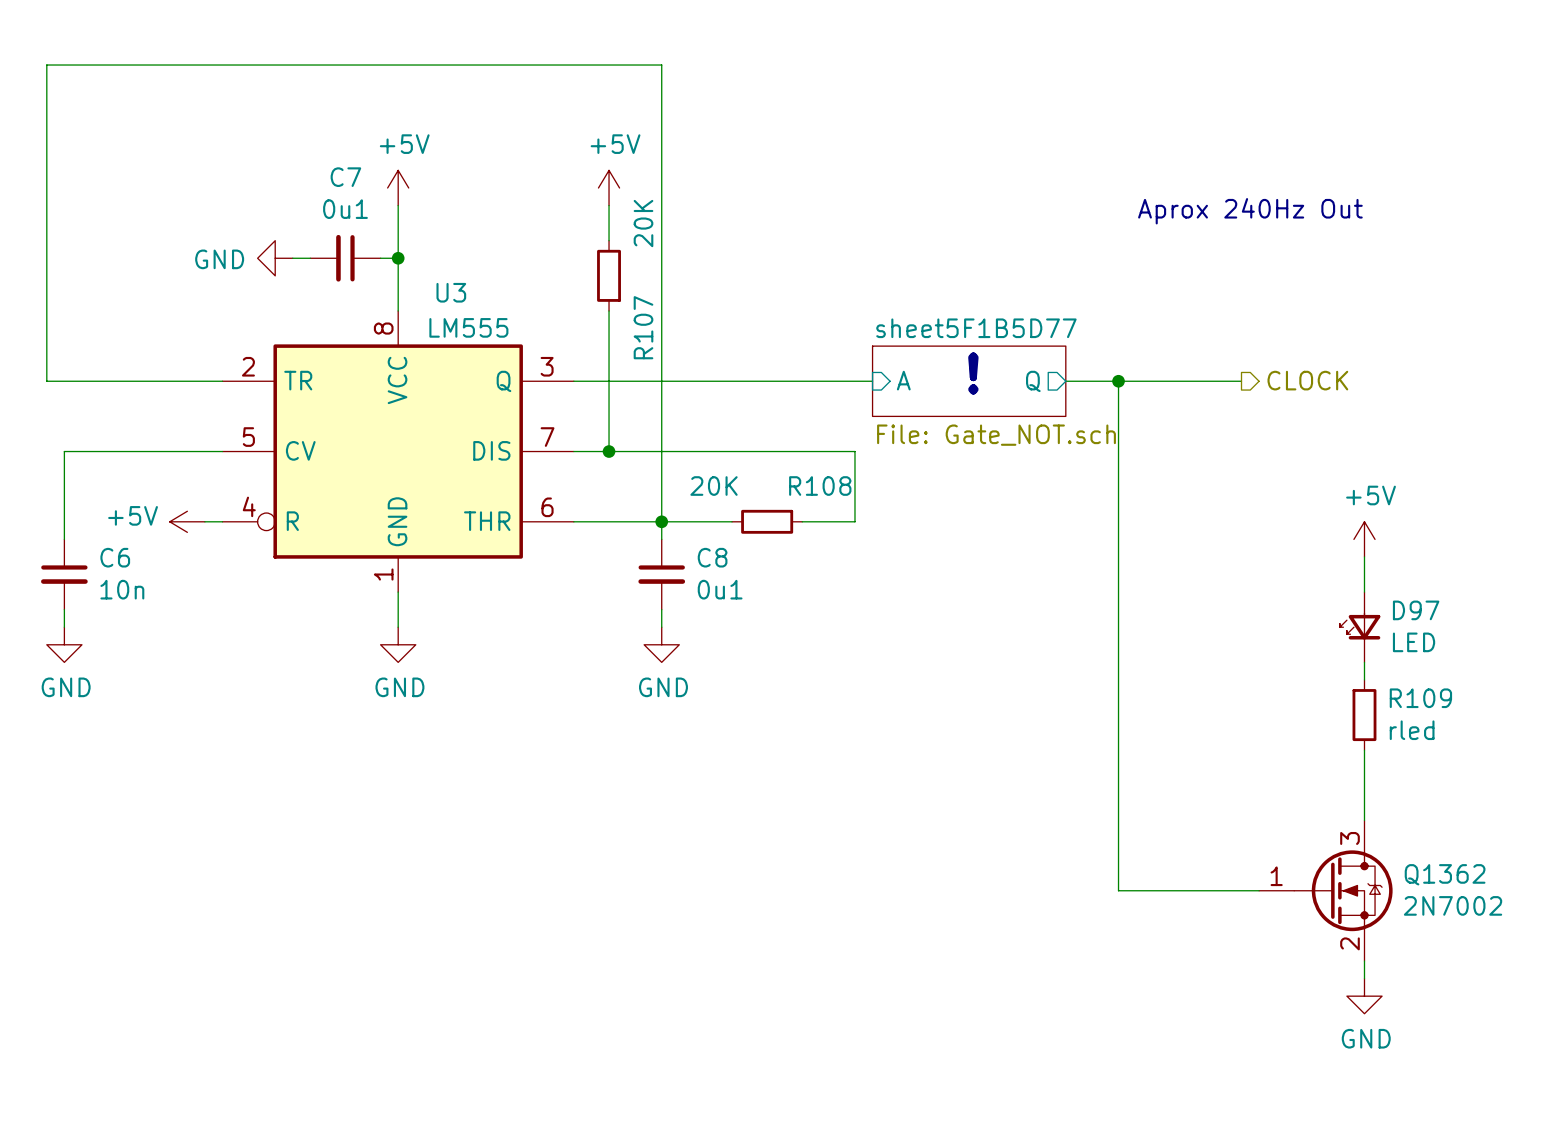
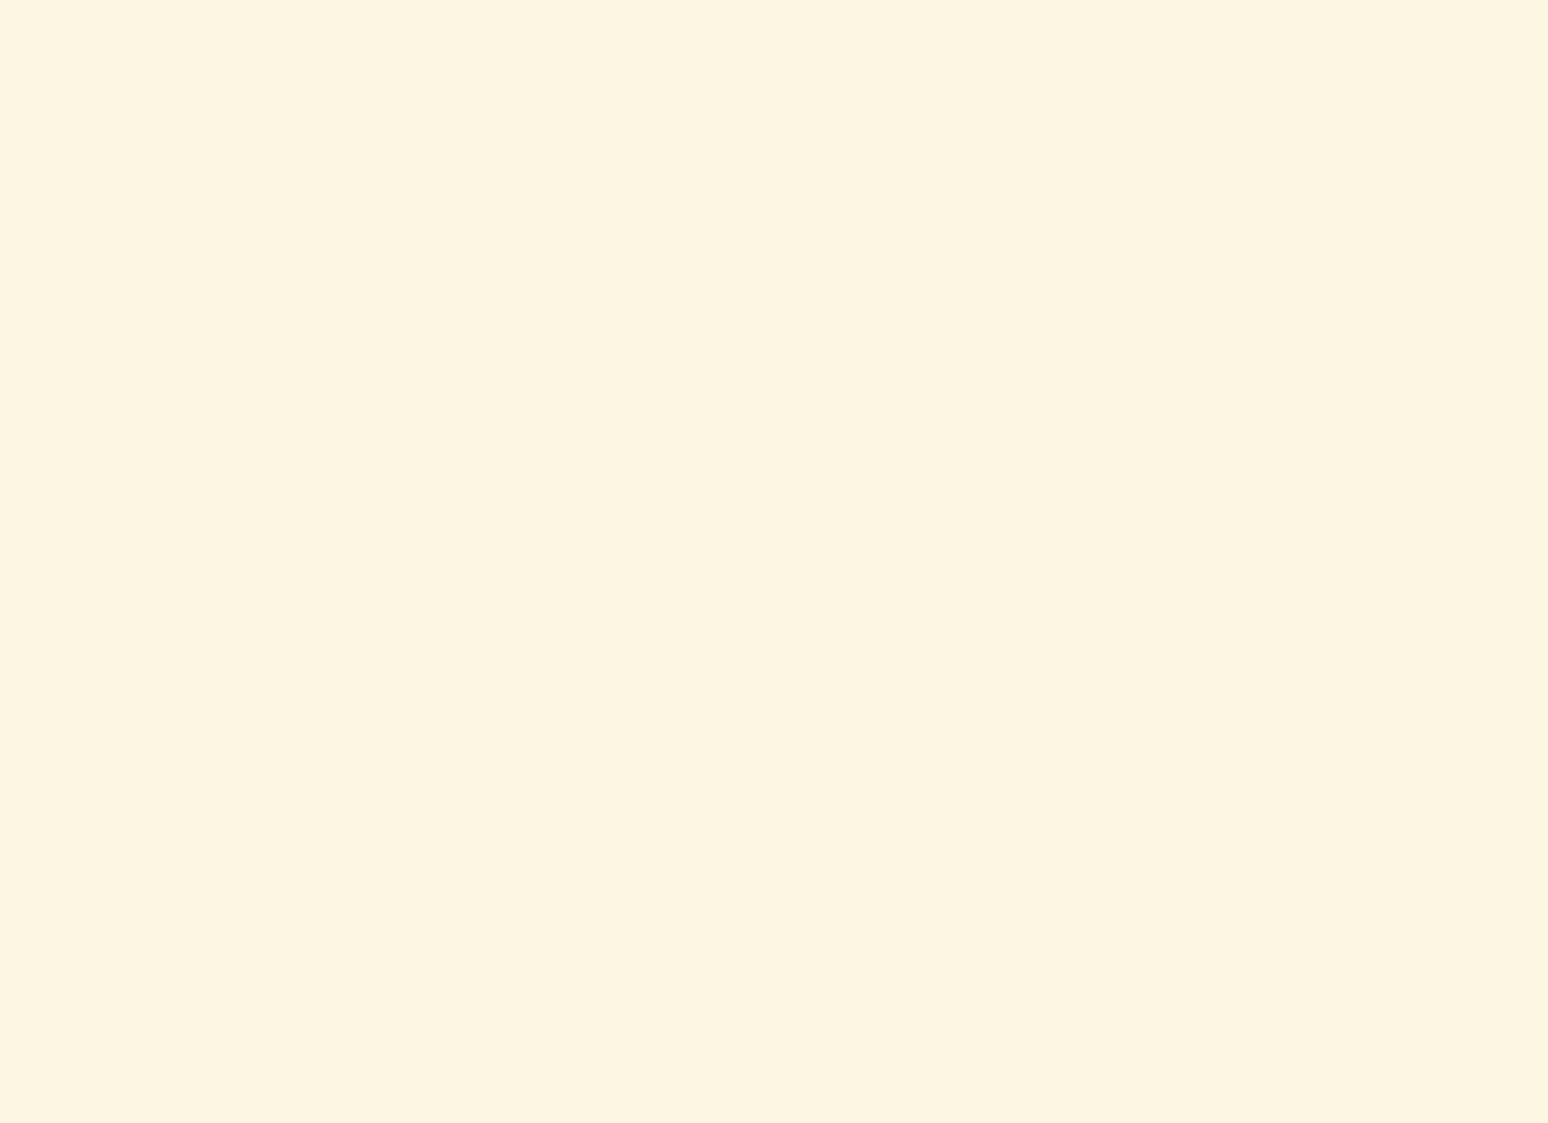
power symbol: +5V (398, 187) -> none
power symbol: +5V (609, 187) -> none
wire: (398, 205) (398, 310) -> none
wire: (609, 205) (609, 240) -> none
text: Aprox 240Hz Out (1250, 211) -> none
power symbol: GND (275, 258) -> none
wire: (292, 258) (310, 258) -> none
C7: 0u1 (345, 258) -> none
wire: (380, 258) (398, 258) -> none
junction: (398, 258) -> none
R107: 20K (609, 275) -> none
wire: (609, 310) (609, 451) -> none
text: ! (973, 373) -> none
sheet pin: A (903, 380) -> none
hierarchical label: CLOCK (1307, 380) -> none
wire: (222, 381) (46, 381) (46, 65) (661, 65) (661, 539) -> none
wire: (573, 381) (872, 381) -> none
sheet sheet5F1B5D77: File: Gate_NOT.sch (969, 381) -> none
sheet pin: Q (1033, 381) -> none
wire: (1065, 381) (1241, 381) -> none
wire: (1118, 381) (1118, 890) (1259, 890) -> none
junction: (1118, 381) -> none
wire: (222, 451) (64, 451) (64, 539) -> none
U3: LM555 (398, 451) -> none
wire: (573, 451) (854, 451) (854, 521) (802, 521) -> none
junction: (609, 451) -> none
power symbol: +5V (187, 521) -> none
wire: (204, 521) (222, 521) -> none
wire: (573, 521) (732, 521) -> none
junction: (661, 521) -> none
R108: 20K (767, 521) -> none
power symbol: +5V (1364, 539) -> none
wire: (1364, 556) (1364, 592) -> none
C6: 10n (64, 574) -> none
C8: 0u1 (661, 574) -> none
wire: (398, 592) (398, 627) -> none
wire: (64, 609) (64, 627) -> none
wire: (661, 609) (661, 627) -> none
D97: LED (1360, 627) -> none
power symbol: GND (64, 644) -> none
power symbol: GND (398, 644) -> none
power symbol: GND (661, 644) -> none
wire: (1364, 662) (1364, 679) -> none
R109: rled (1364, 715) -> none
wire: (1364, 750) (1364, 820) -> none
Q1362: 2N7002 (1325, 890) -> none
wire: (1364, 961) (1364, 978) -> none
power symbol: GND (1364, 996) -> none

